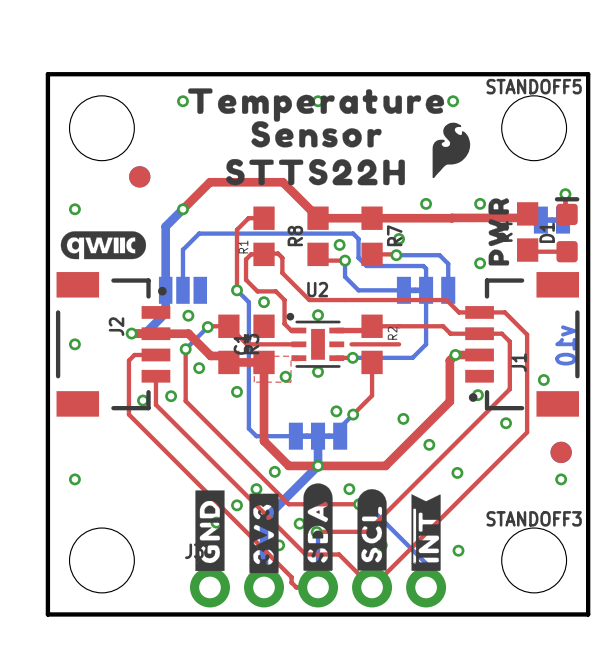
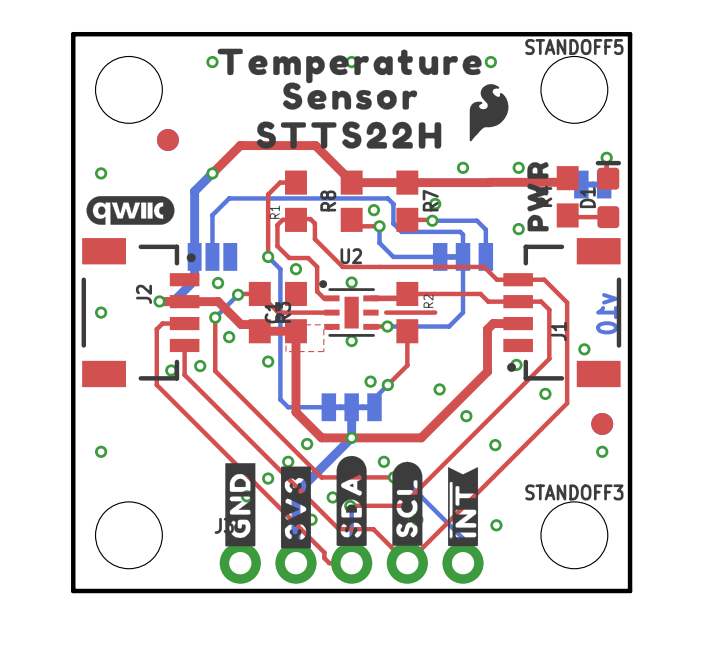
via: (455, 354) -> none
via: (285, 376) -> none

